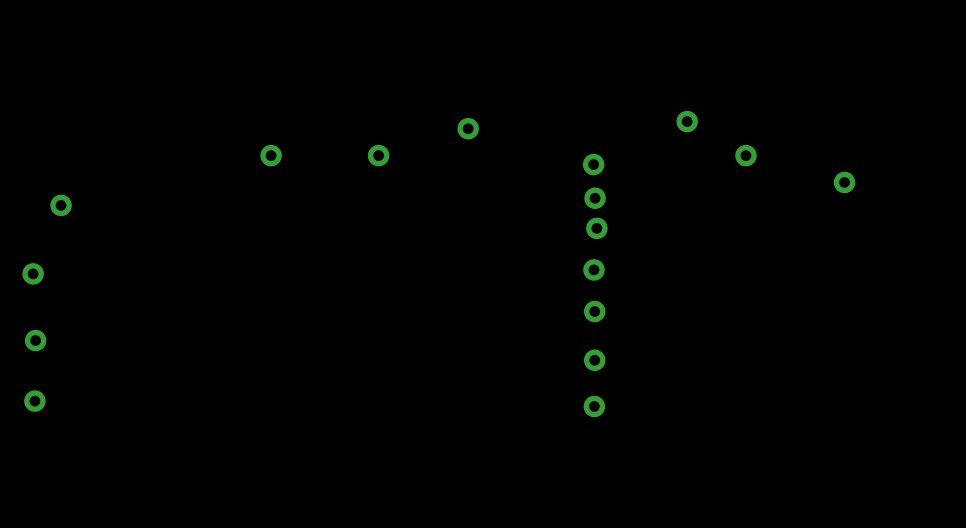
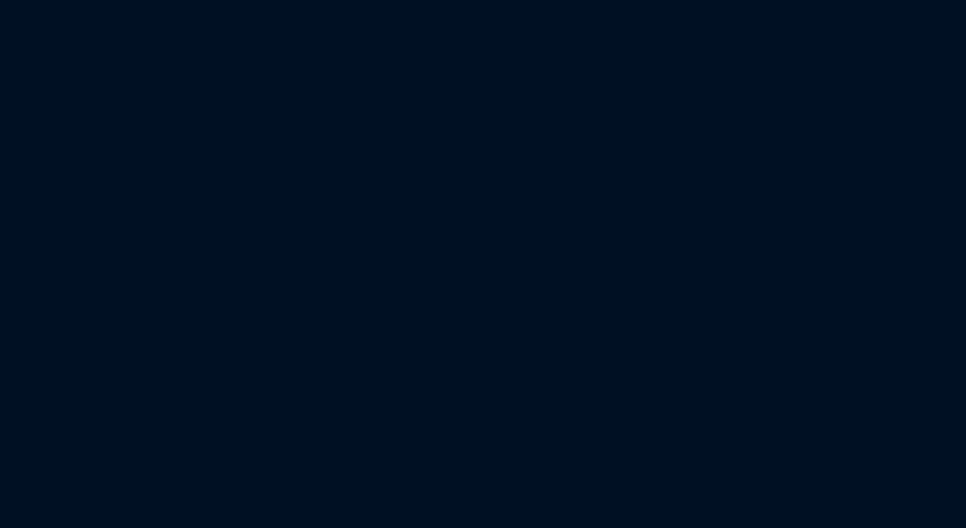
via: (687, 121) -> none
via: (468, 128) -> none
via: (271, 155) -> none
via: (378, 155) -> none
via: (745, 155) -> none
via: (593, 164) -> none
via: (844, 182) -> none
via: (595, 198) -> none
via: (61, 205) -> none
via: (596, 228) -> none
via: (594, 269) -> none
via: (33, 273) -> none
via: (594, 311) -> none
via: (35, 340) -> none
via: (594, 360) -> none
via: (34, 401) -> none
via: (594, 406) -> none

